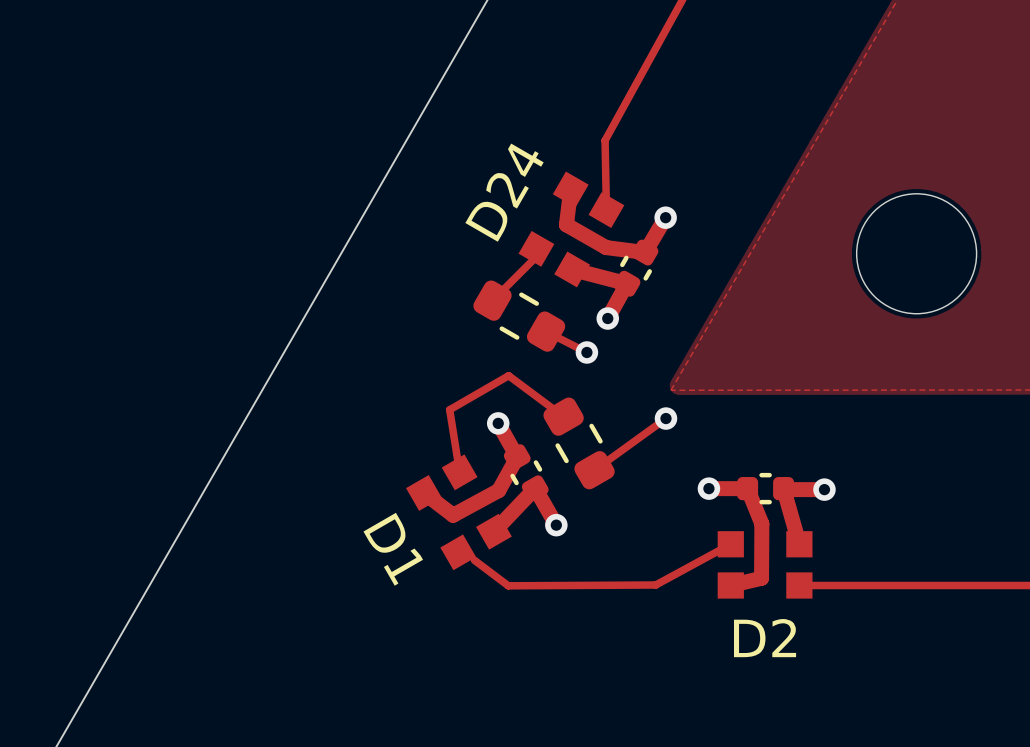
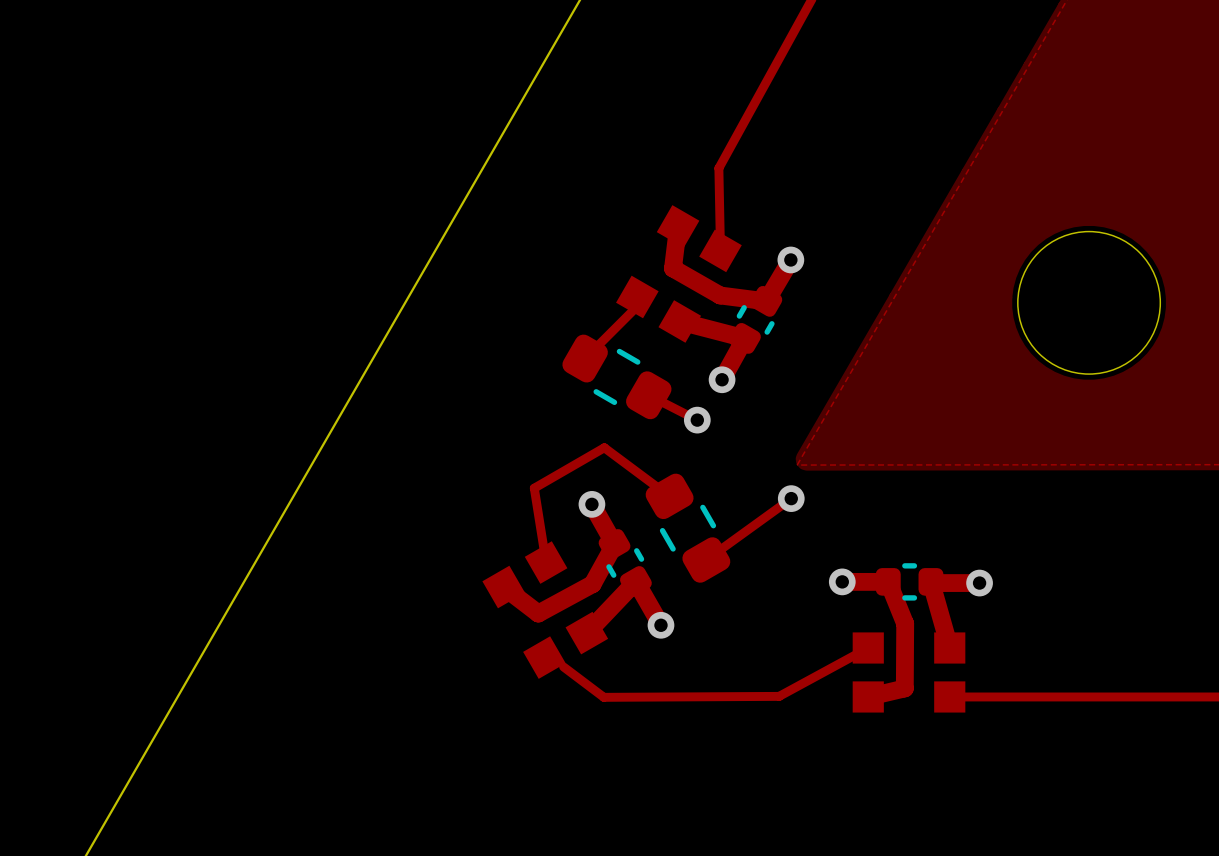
D24 name: D24 (504, 192) -> none
D1 name: D1 (393, 549) -> none
D2 name: D2 (765, 638) -> none

